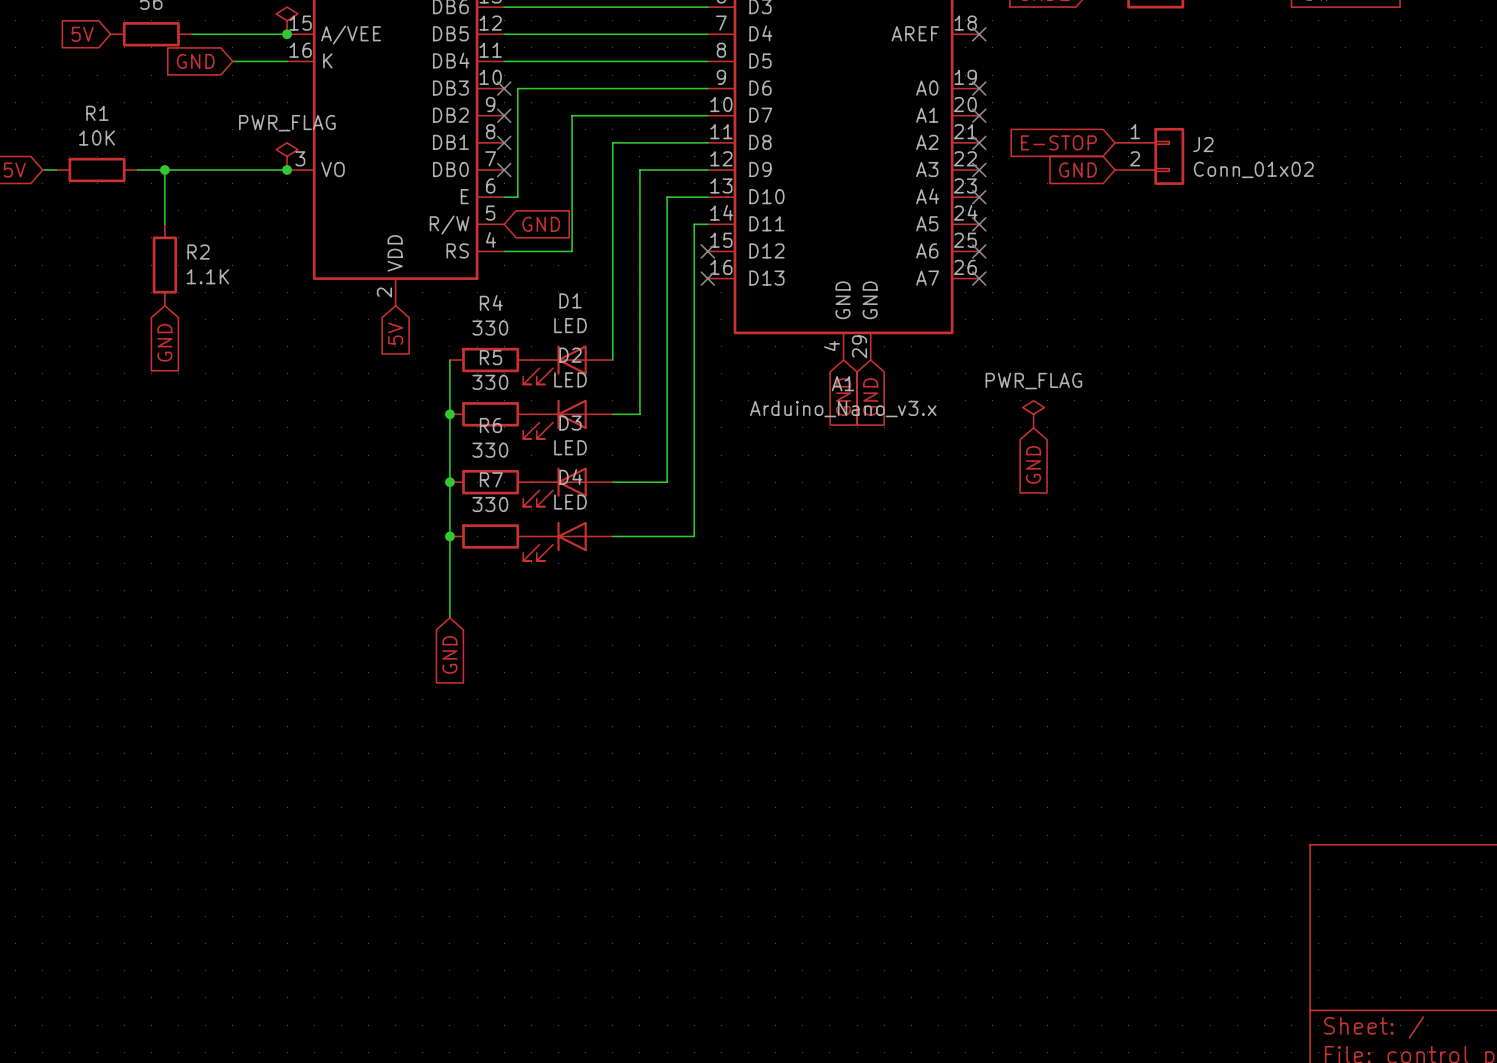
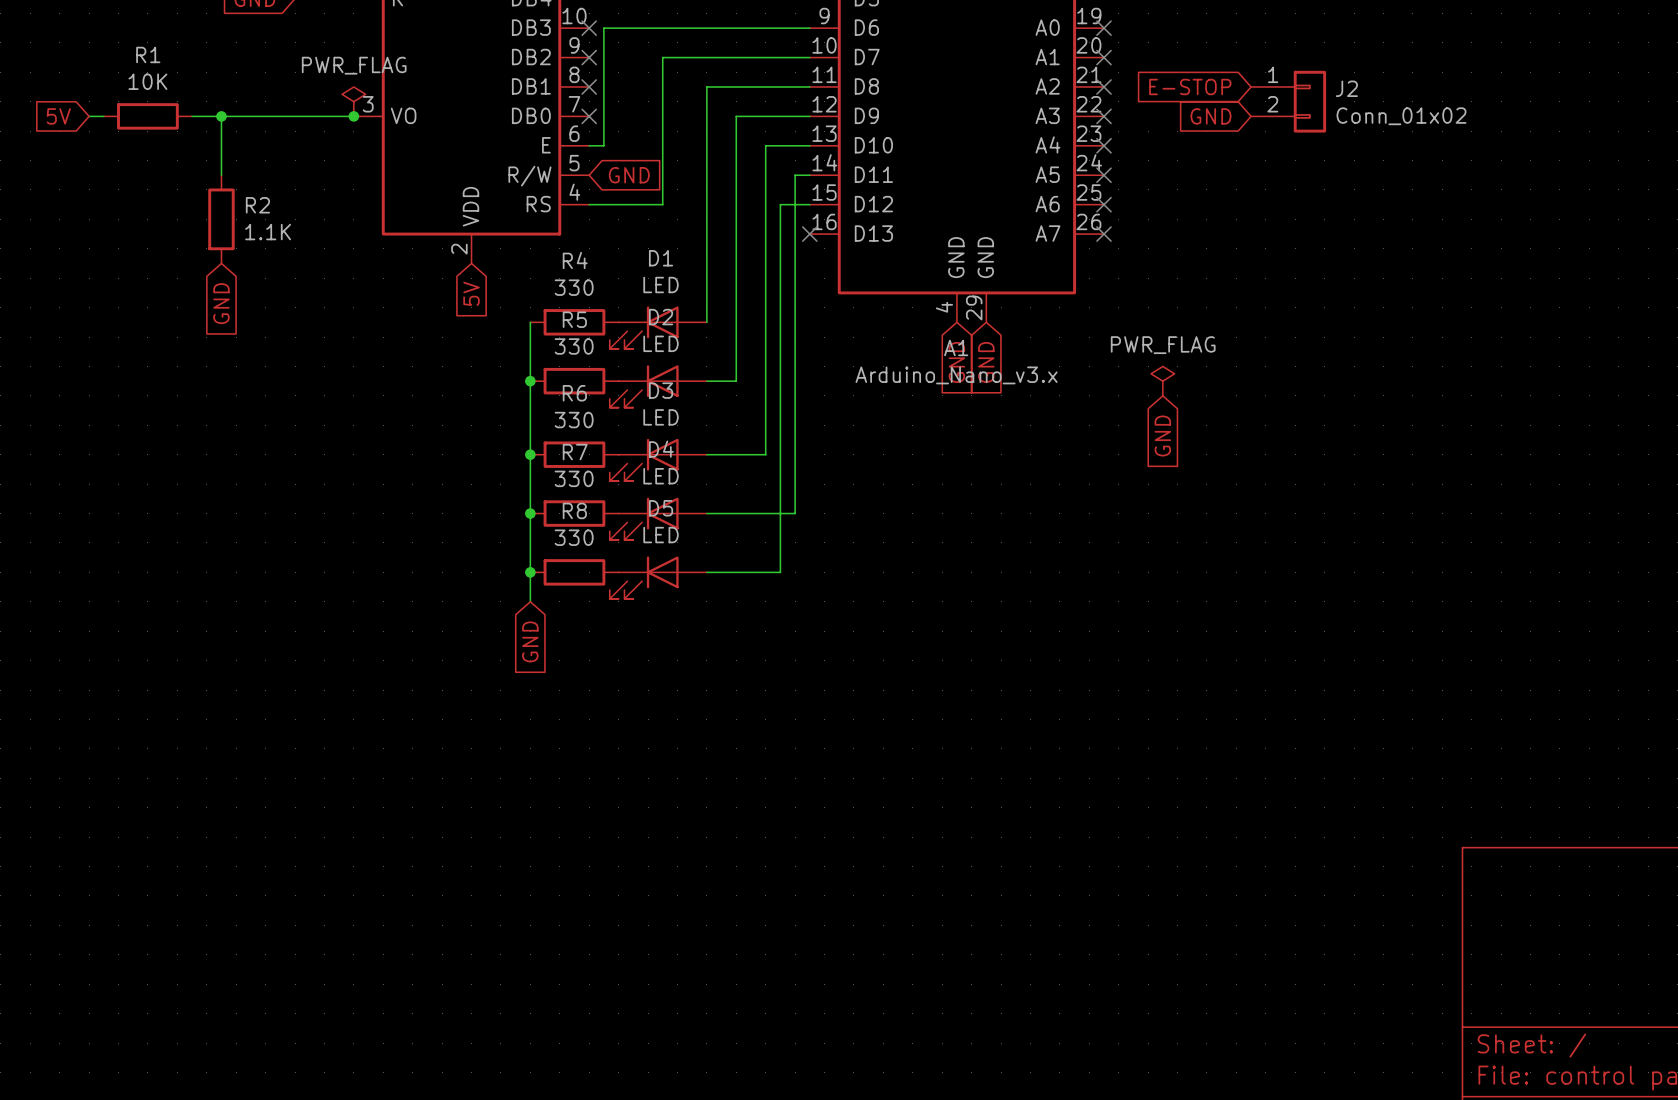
wire: none -> (809, 204) (780, 204) (780, 572) (706, 572)
no-connect mark: (707, 251) -> none
junction: none -> (530, 572)
R8: none -> 330 (574, 572)
D5: none -> LED (658, 577)

